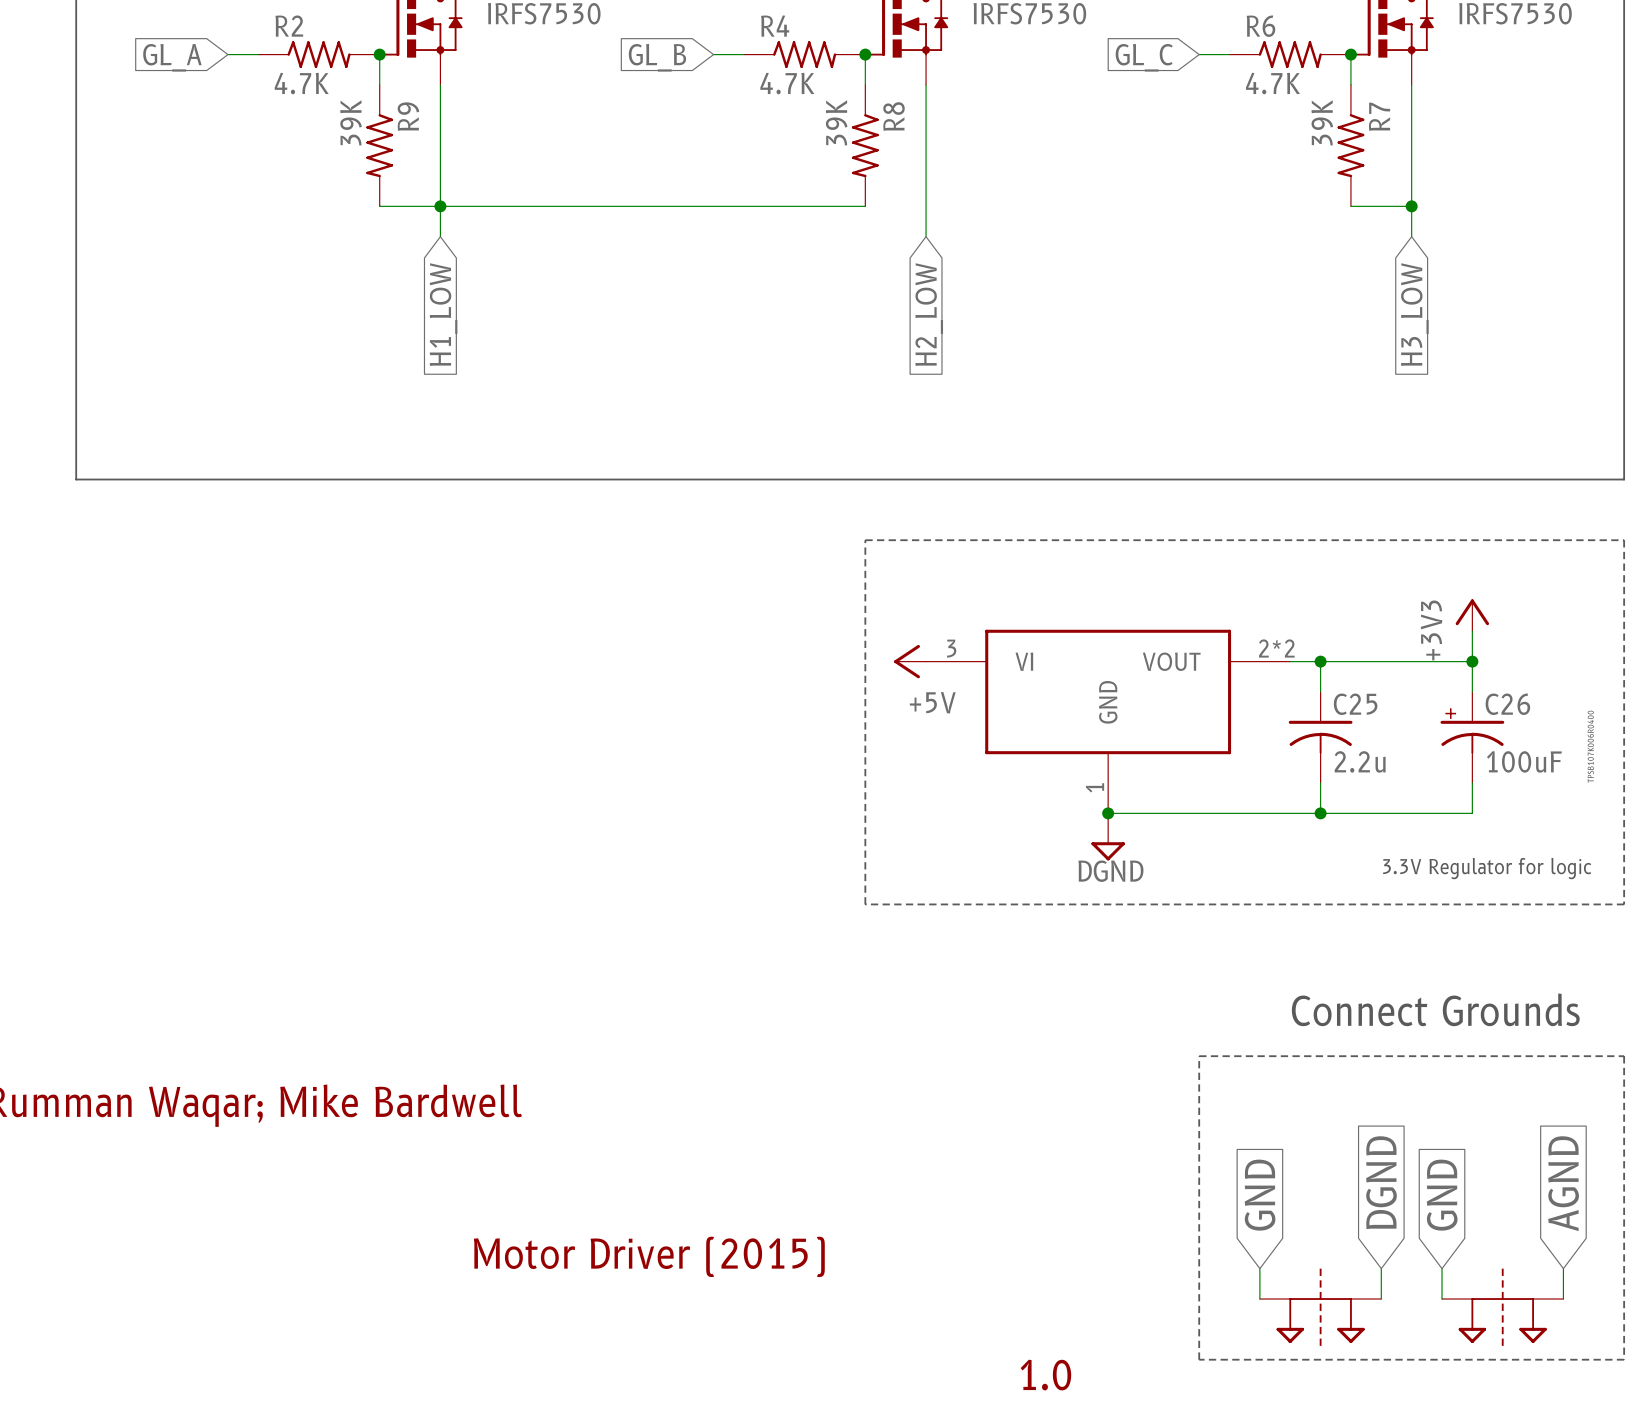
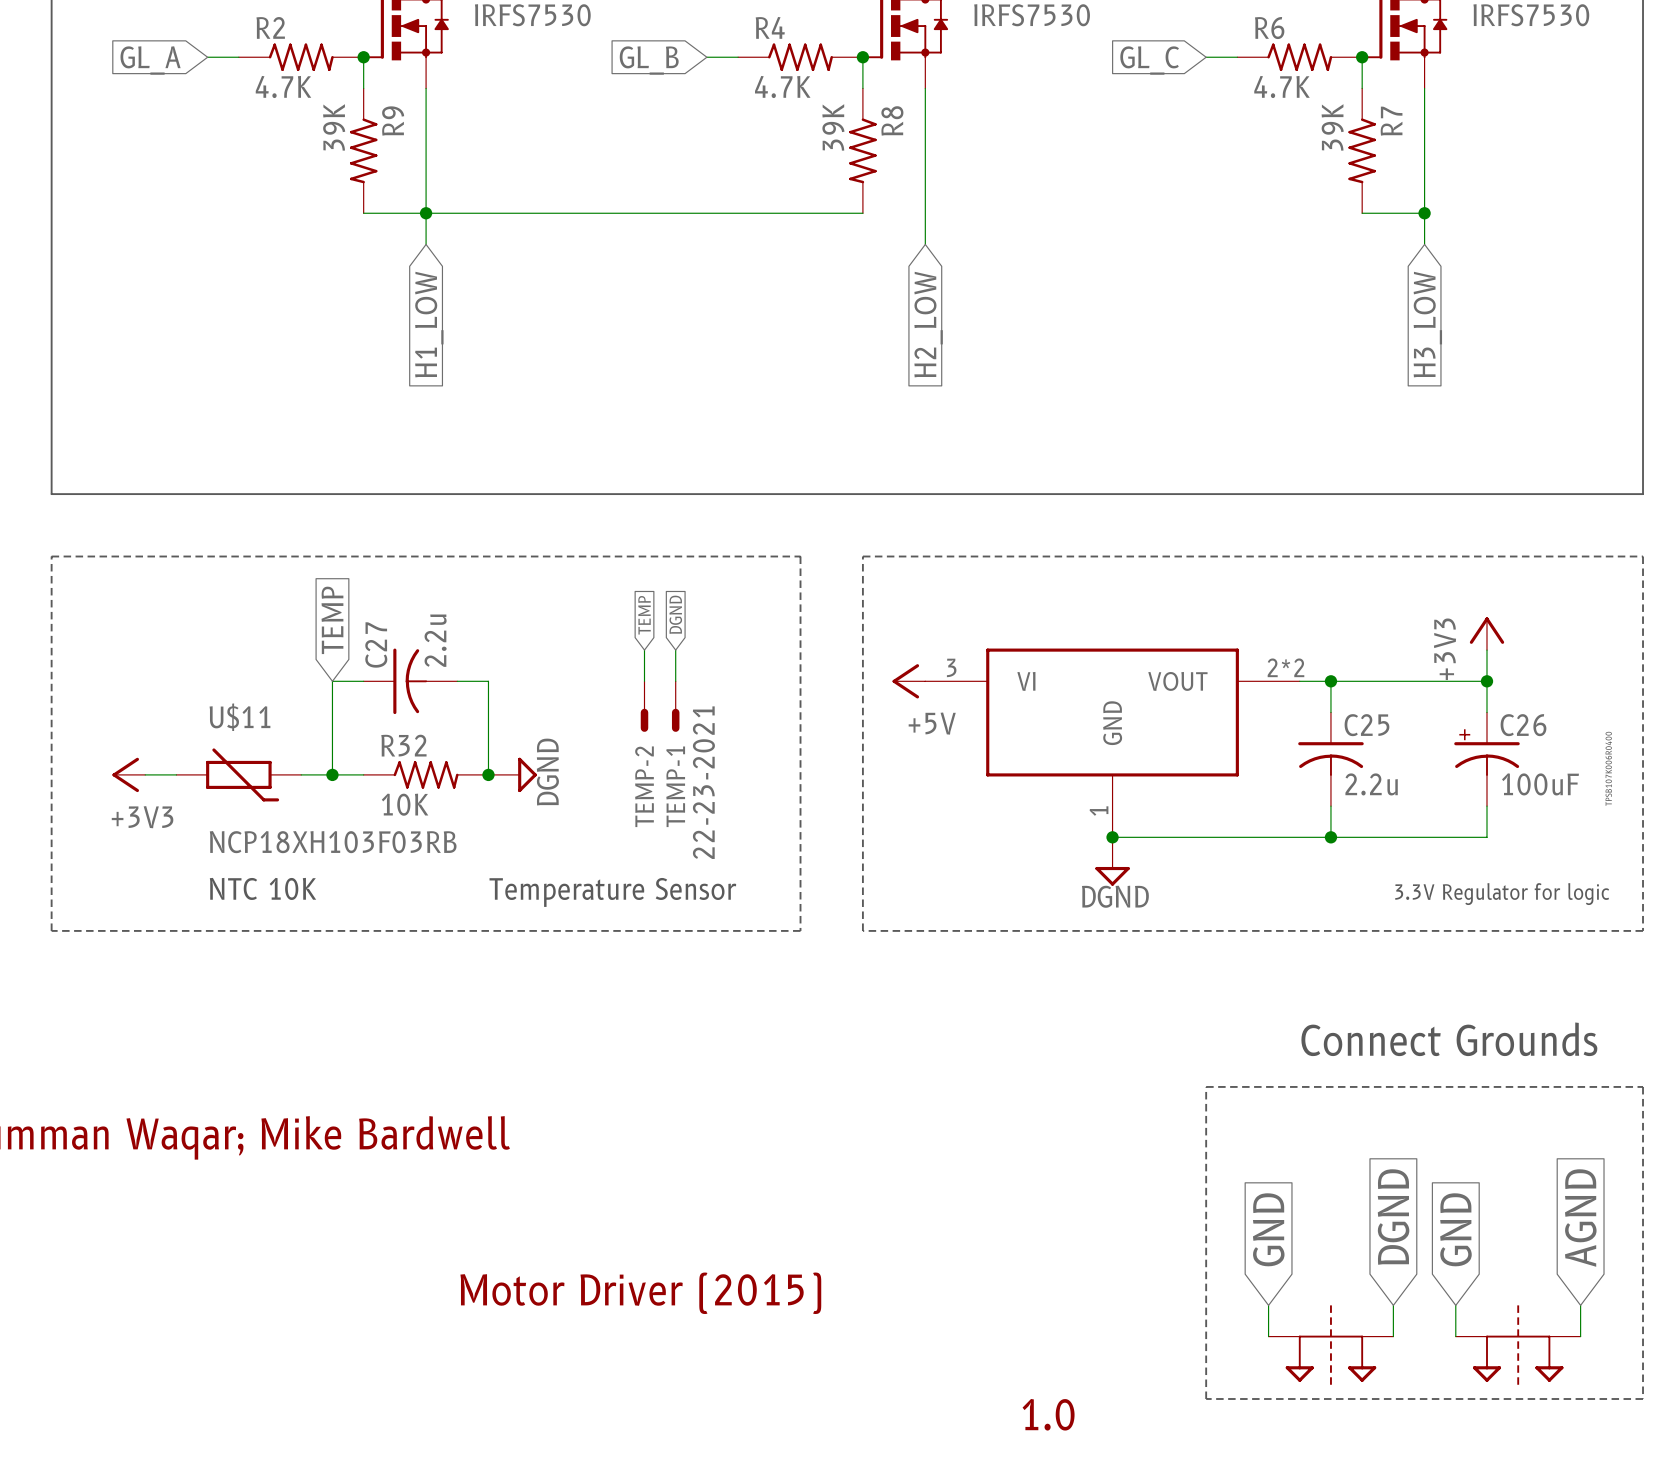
line: none -> (51, 556) (51, 930) (800, 930) (800, 556) (51, 556)
global label: none -> DGND (675, 614)
global label: none -> TEMP (644, 615)
global label: none -> TEMP (332, 620)
wire: none -> (644, 650) (644, 681)
wire: none -> (675, 650) (675, 681)
wire: none -> (363, 681) (332, 681) (332, 774)
C27: none -> 2.2u (410, 681)
wire: none -> (457, 681) (488, 681) (488, 774)
TEMP-2: none -> (644, 706)
TEMP-1: none -> 22-23-2021 (675, 706)
power symbol: none -> +3V3 (128, 774)
wire: none -> (145, 774) (176, 774)
U$11: none -> NCP18XH103F03RB (238, 774)
wire: none -> (301, 774) (363, 774)
junction: none -> (332, 774)
R32: none -> 10K (426, 774)
junction: none -> (488, 774)
power symbol: none -> DGND (512, 774)
text: none -> NTC 10K (263, 888)
text: none -> Temperature Sensor (612, 892)

